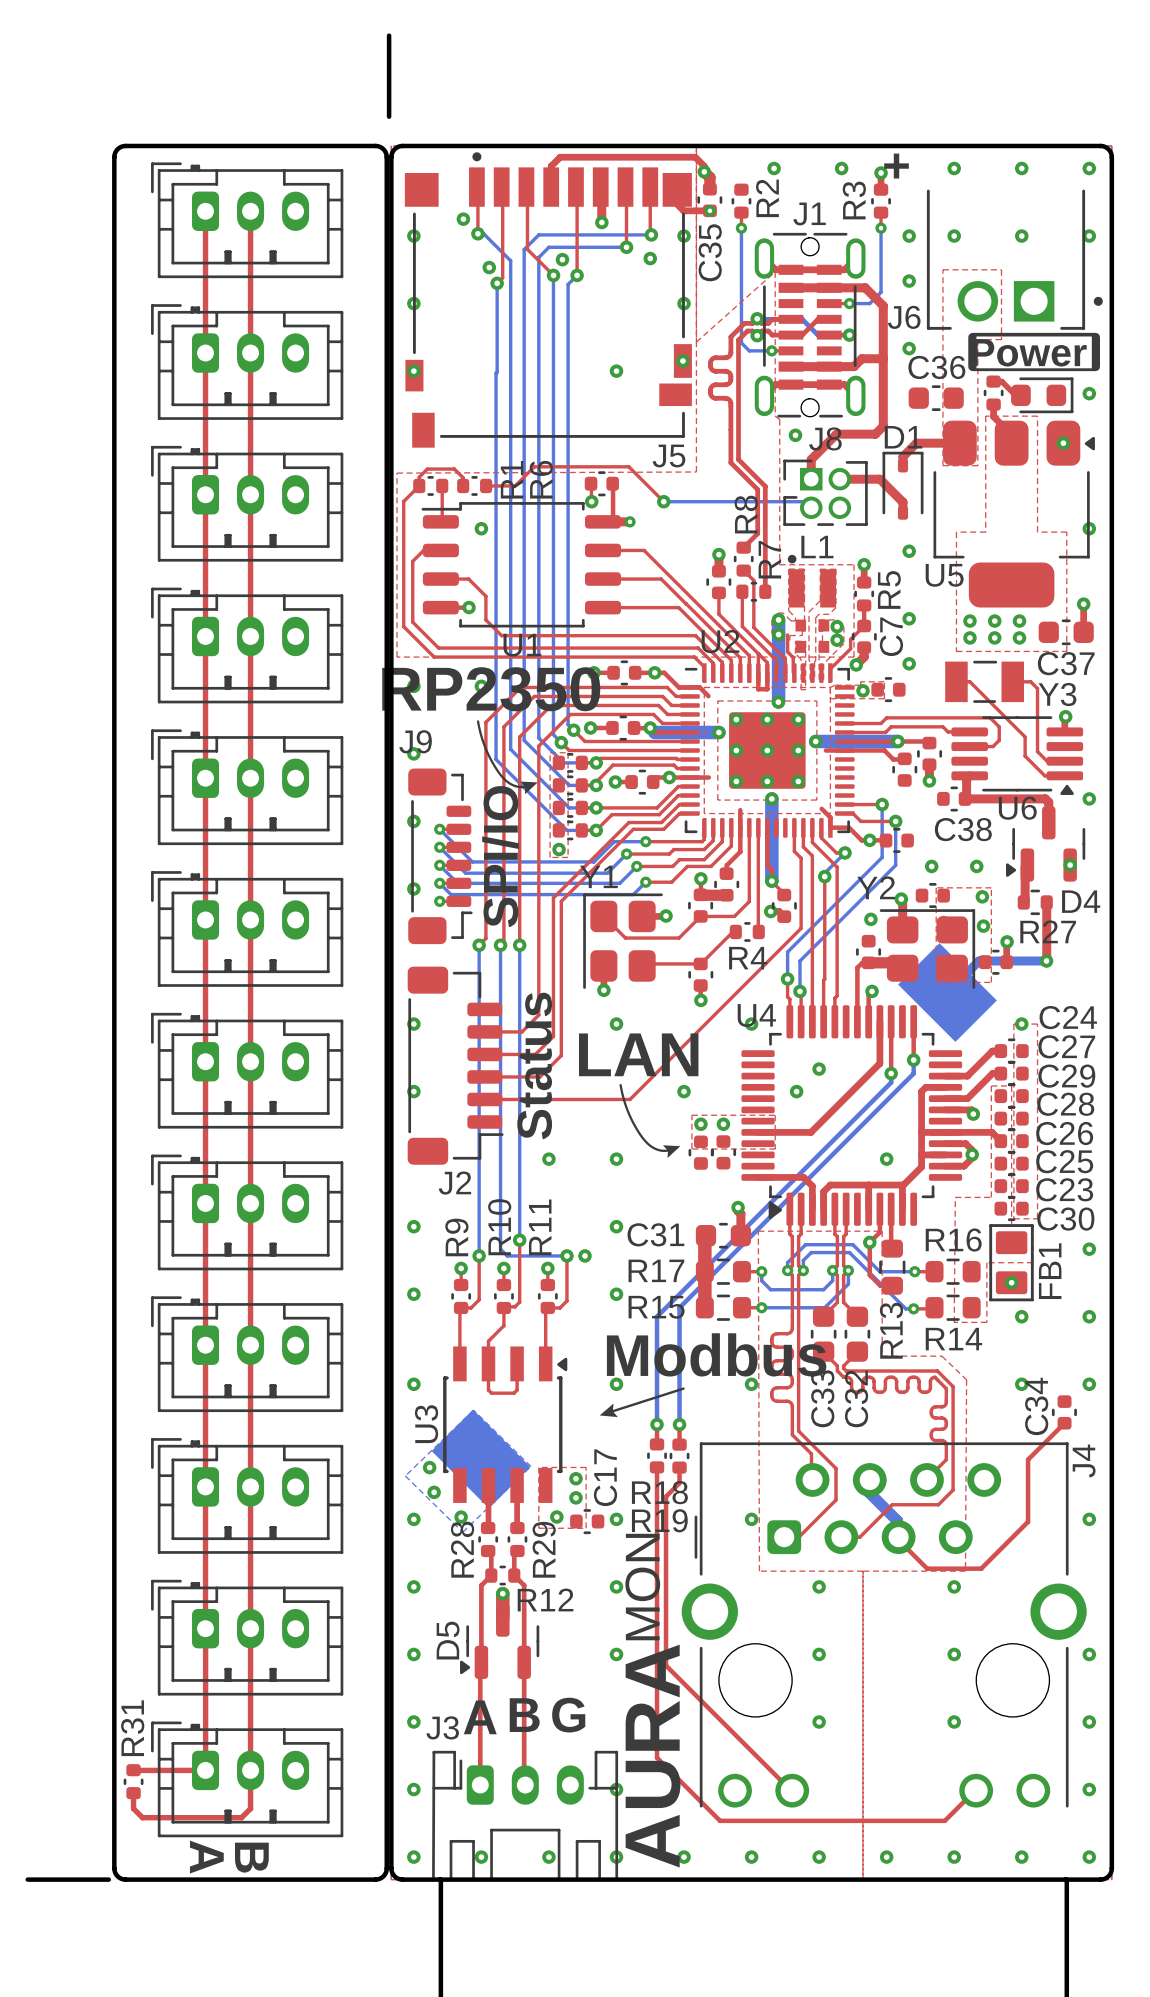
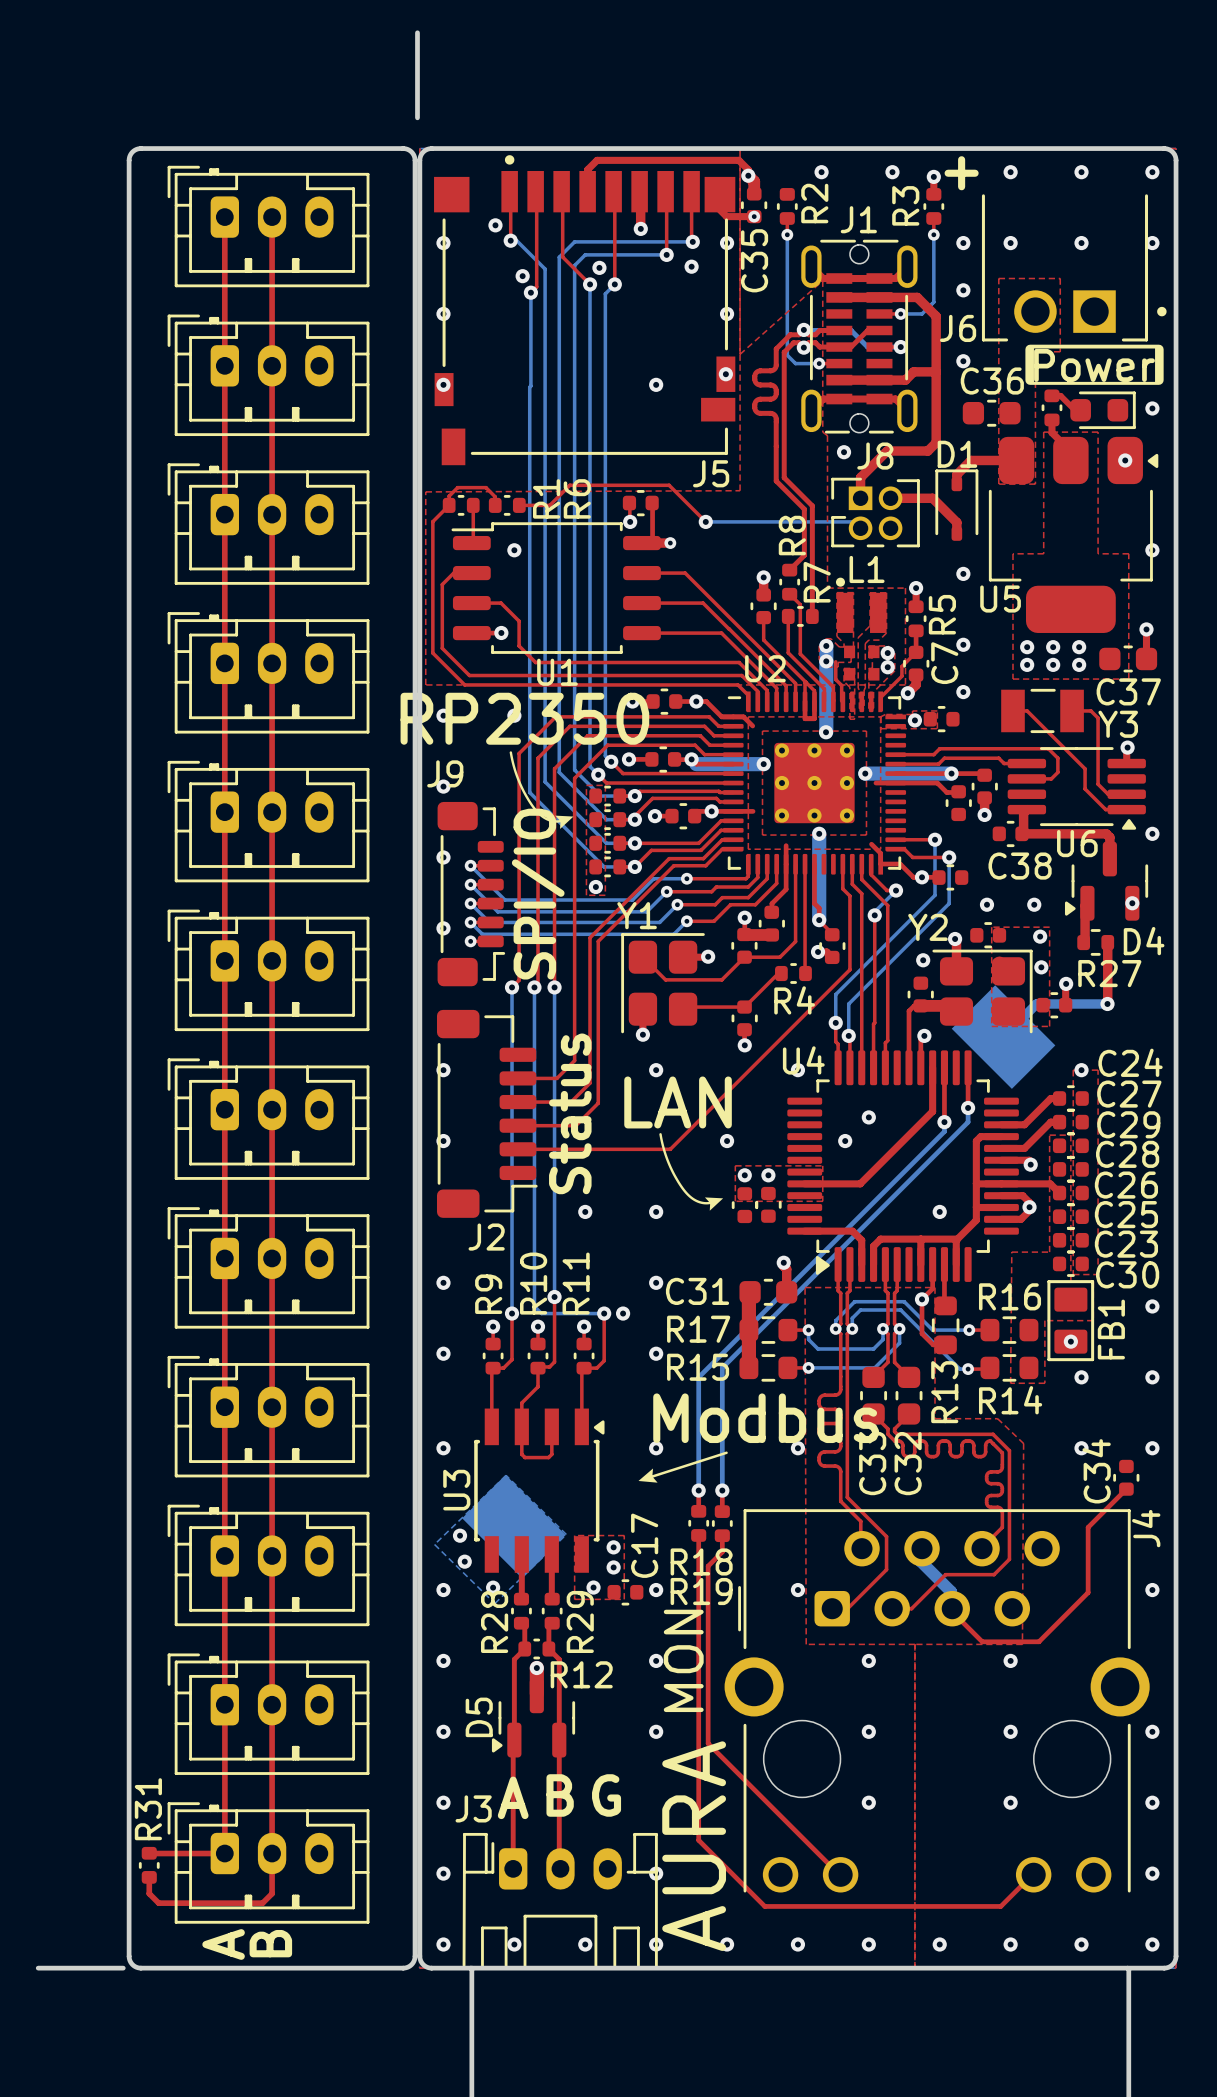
text rotation: 0° (206, 1857) -> 180° (223, 1944)
text rotation: 0° (251, 1857) -> 180° (270, 1943)

